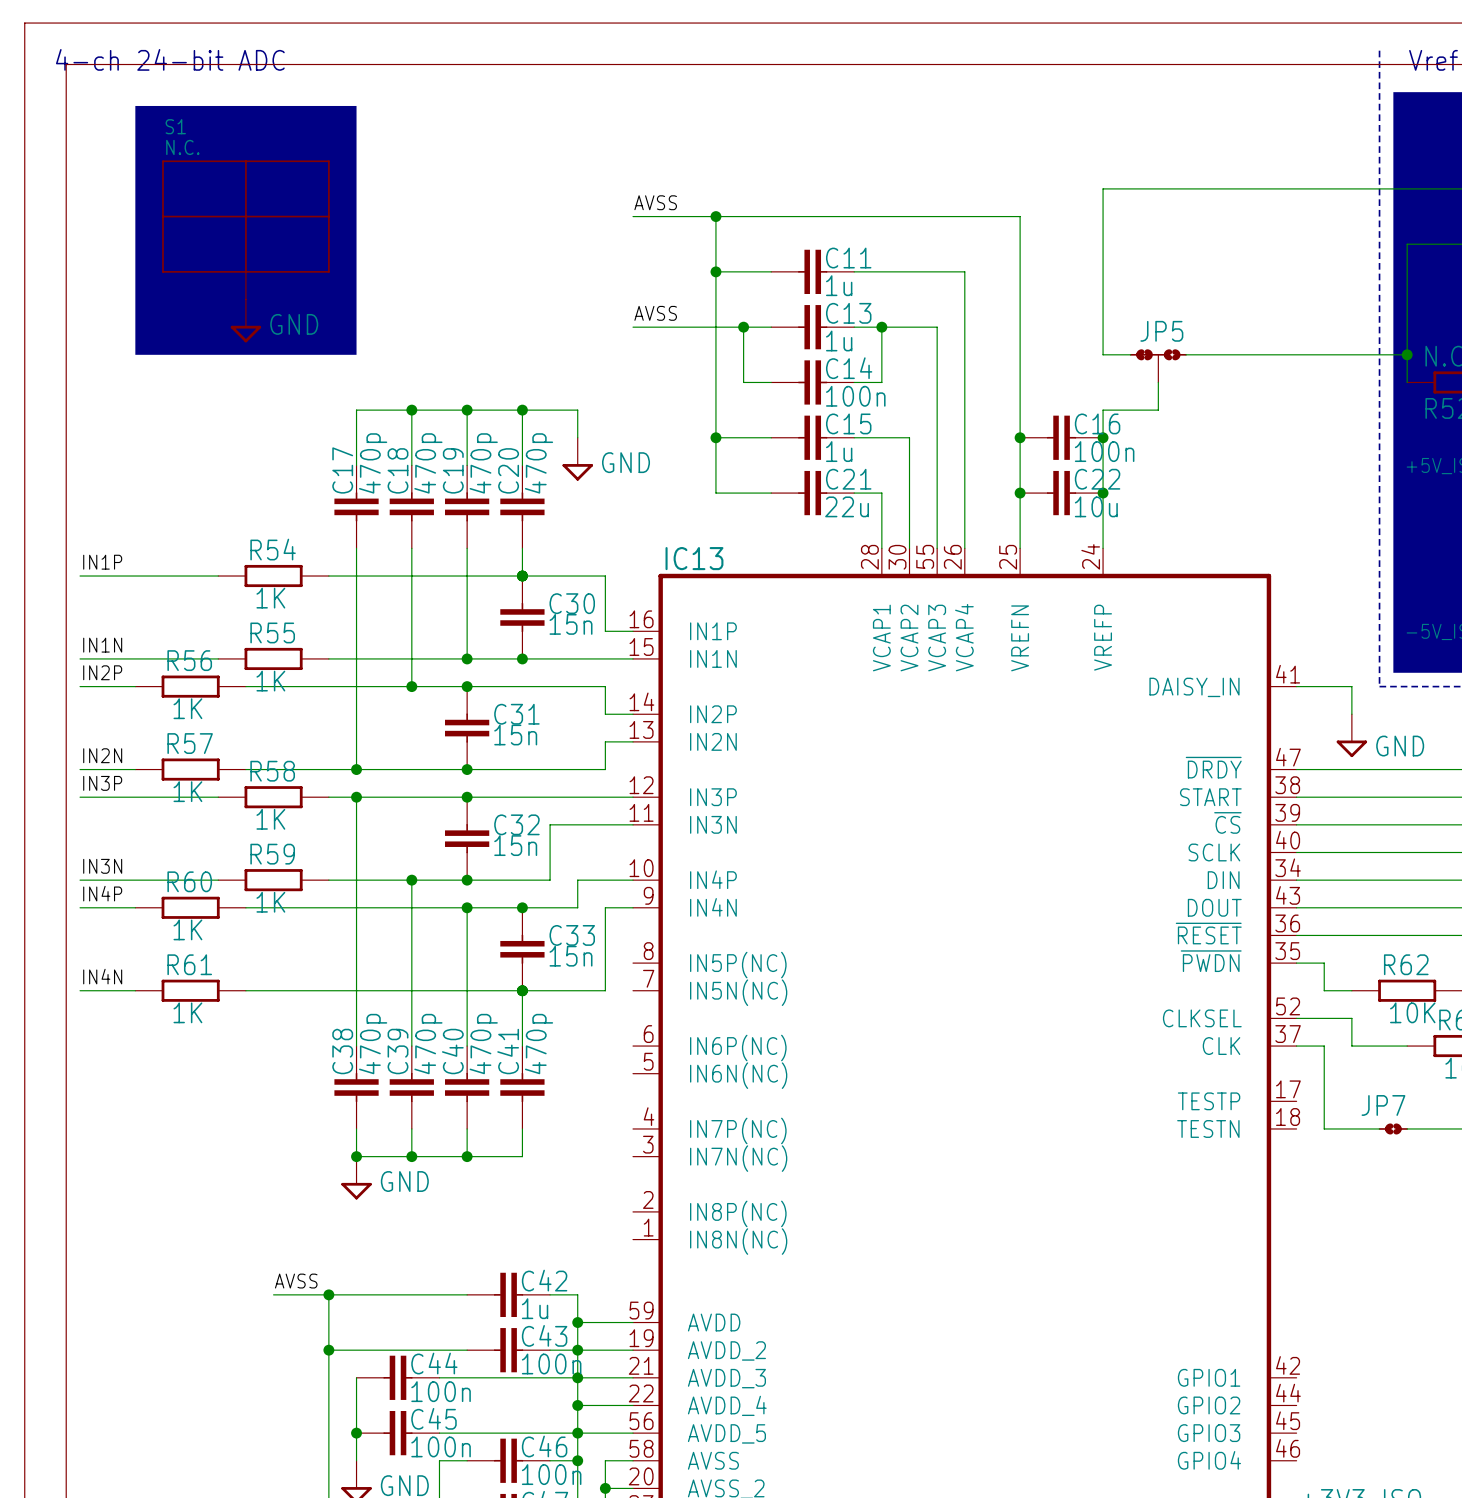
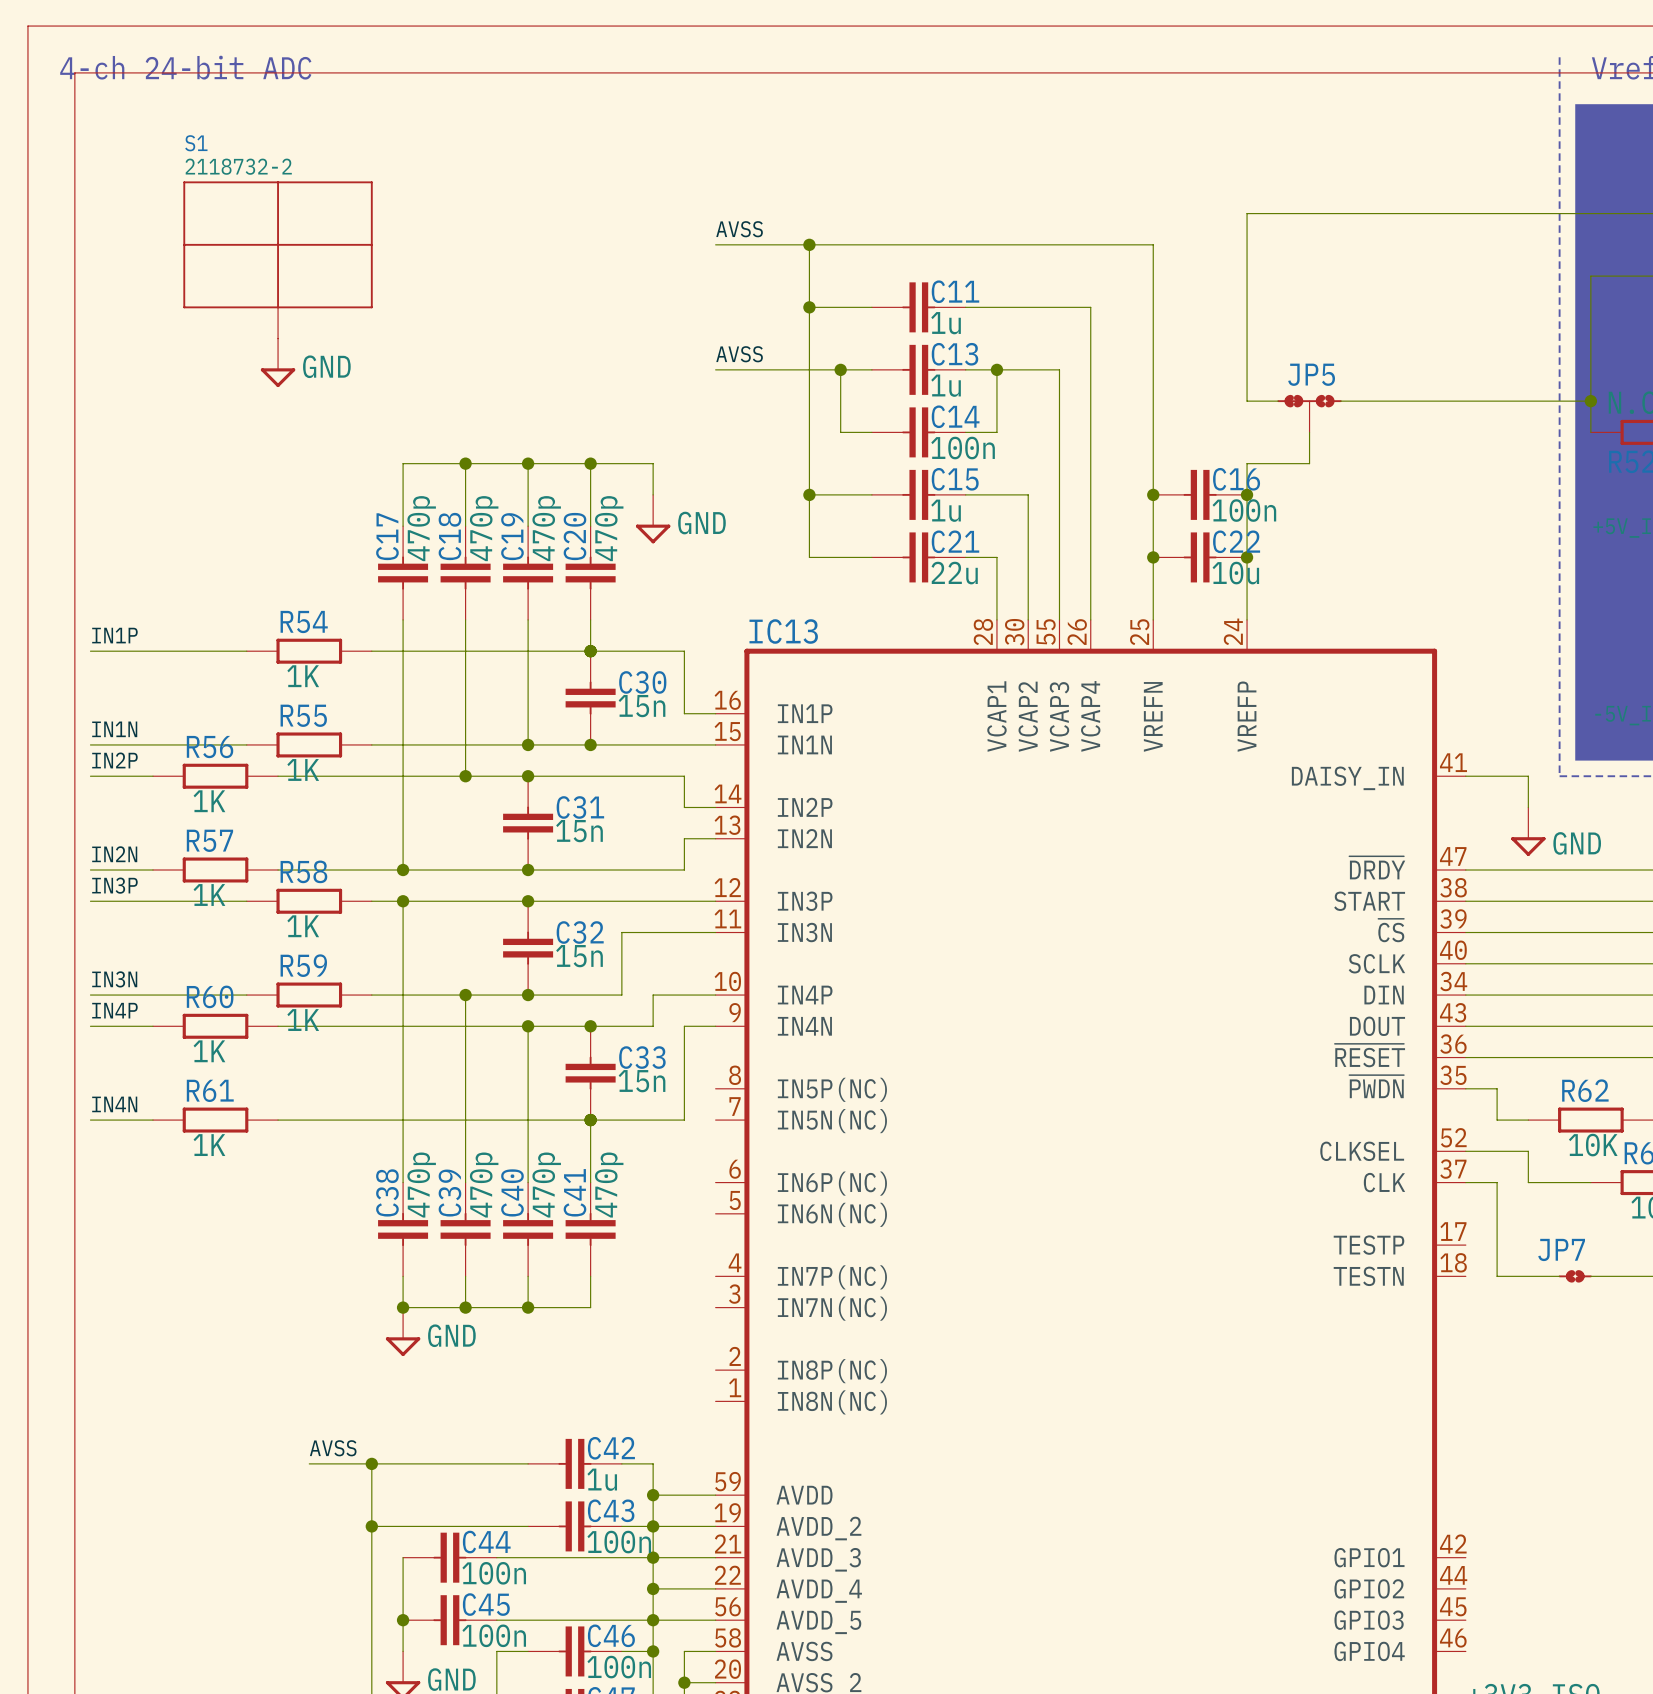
drawing: [135, 105, 357, 355] -> none
S1 value: N.C. (182, 147) -> 2118732-2 (238, 166)

